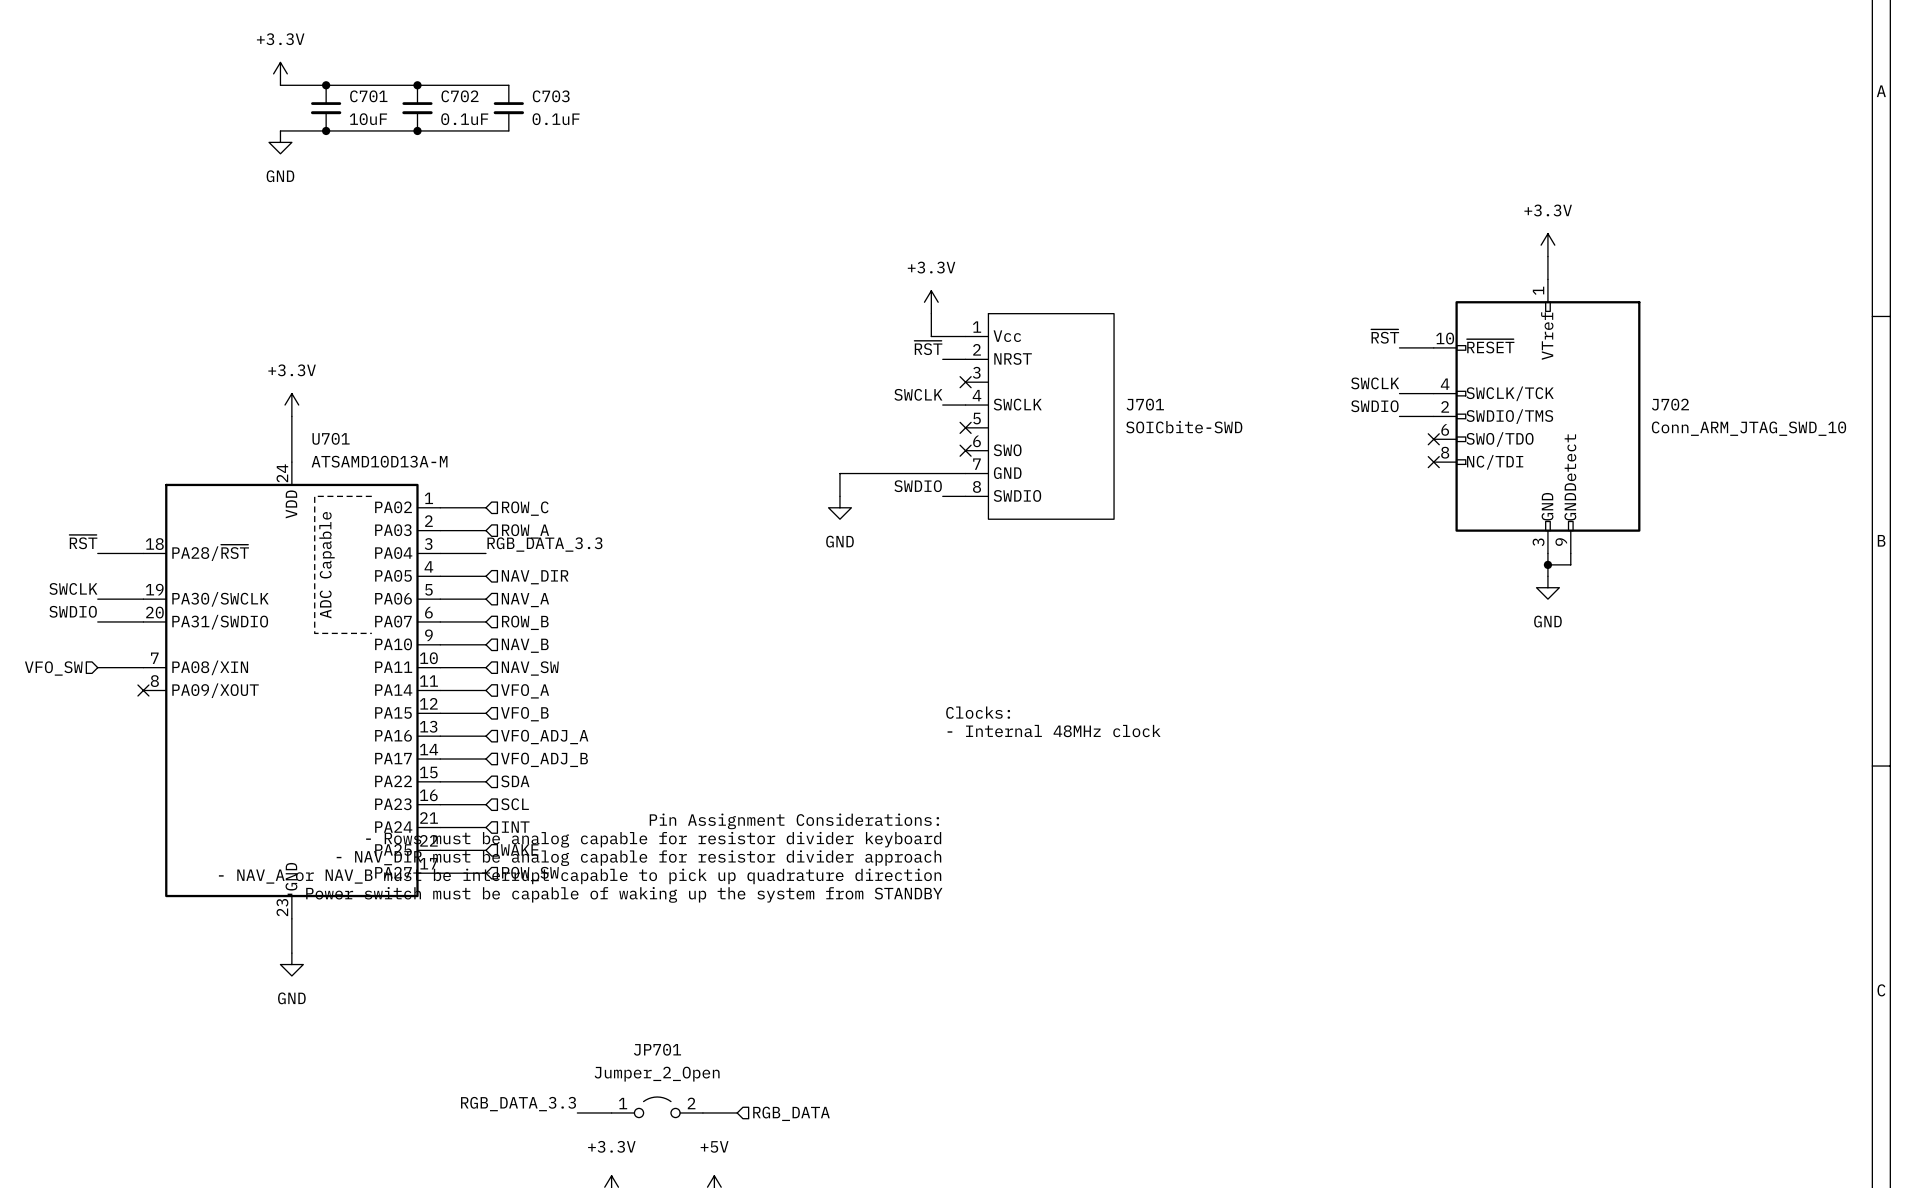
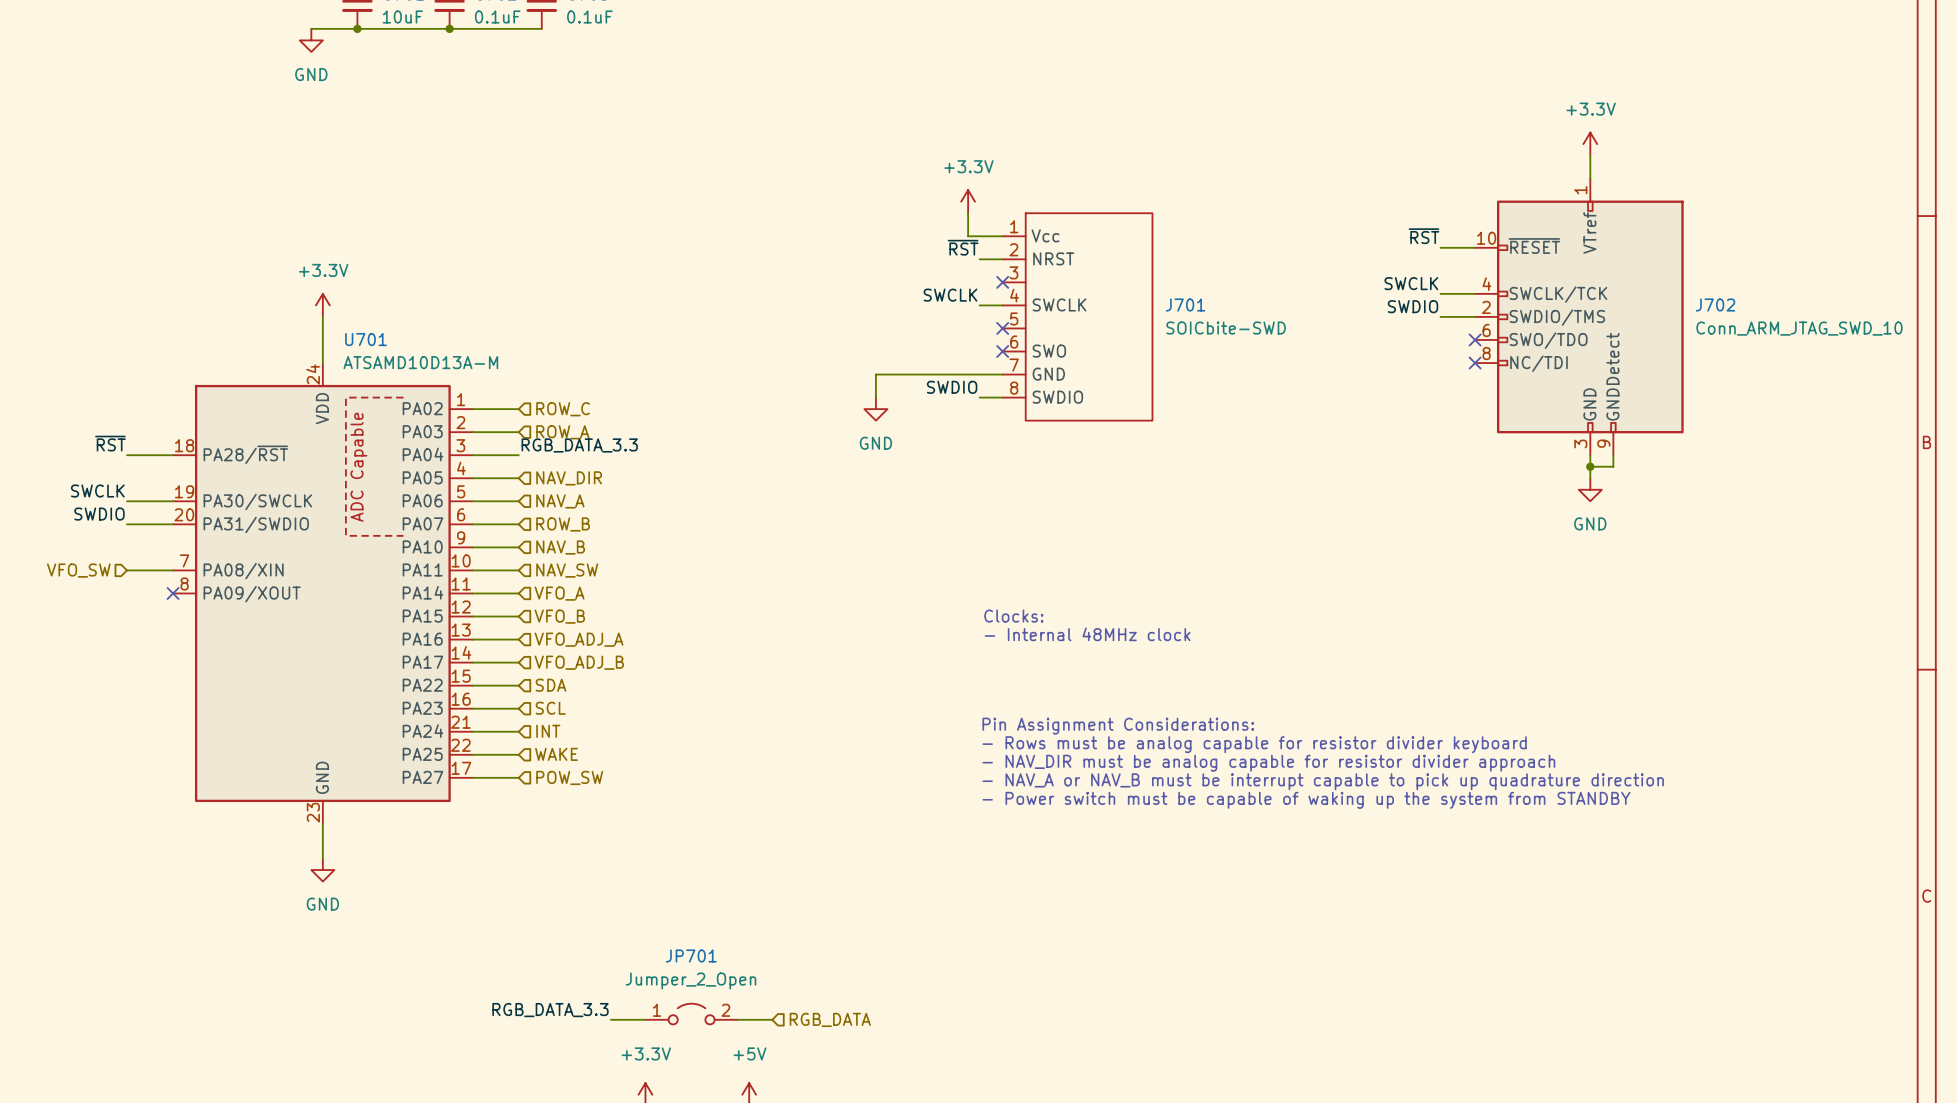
text position: Pin Assignment Considerations: (794, 821) -> Pin Assignment Considerations: (1118, 726)
text position: - Rows must be analog capable for resistor divider keyboard (653, 839) -> - Rows must be analog capable for resistor divider keyboard (1254, 744)
text position: - NAV_DIR must be analog capable for resistor divider approach (638, 858) -> - NAV_DIR must be analog capable for resistor divider approach (1268, 763)
text position: - NAV_A or NAV_B must be interrupt capable to pick up quadrature direction (580, 876) -> - NAV_A or NAV_B must be interrupt capable to pick up quadrature direction (1323, 781)
text position: - Power switch must be capable of waking up the system from STANDBY (615, 894) -> - Power switch must be capable of waking up the system from STANDBY (1306, 800)

